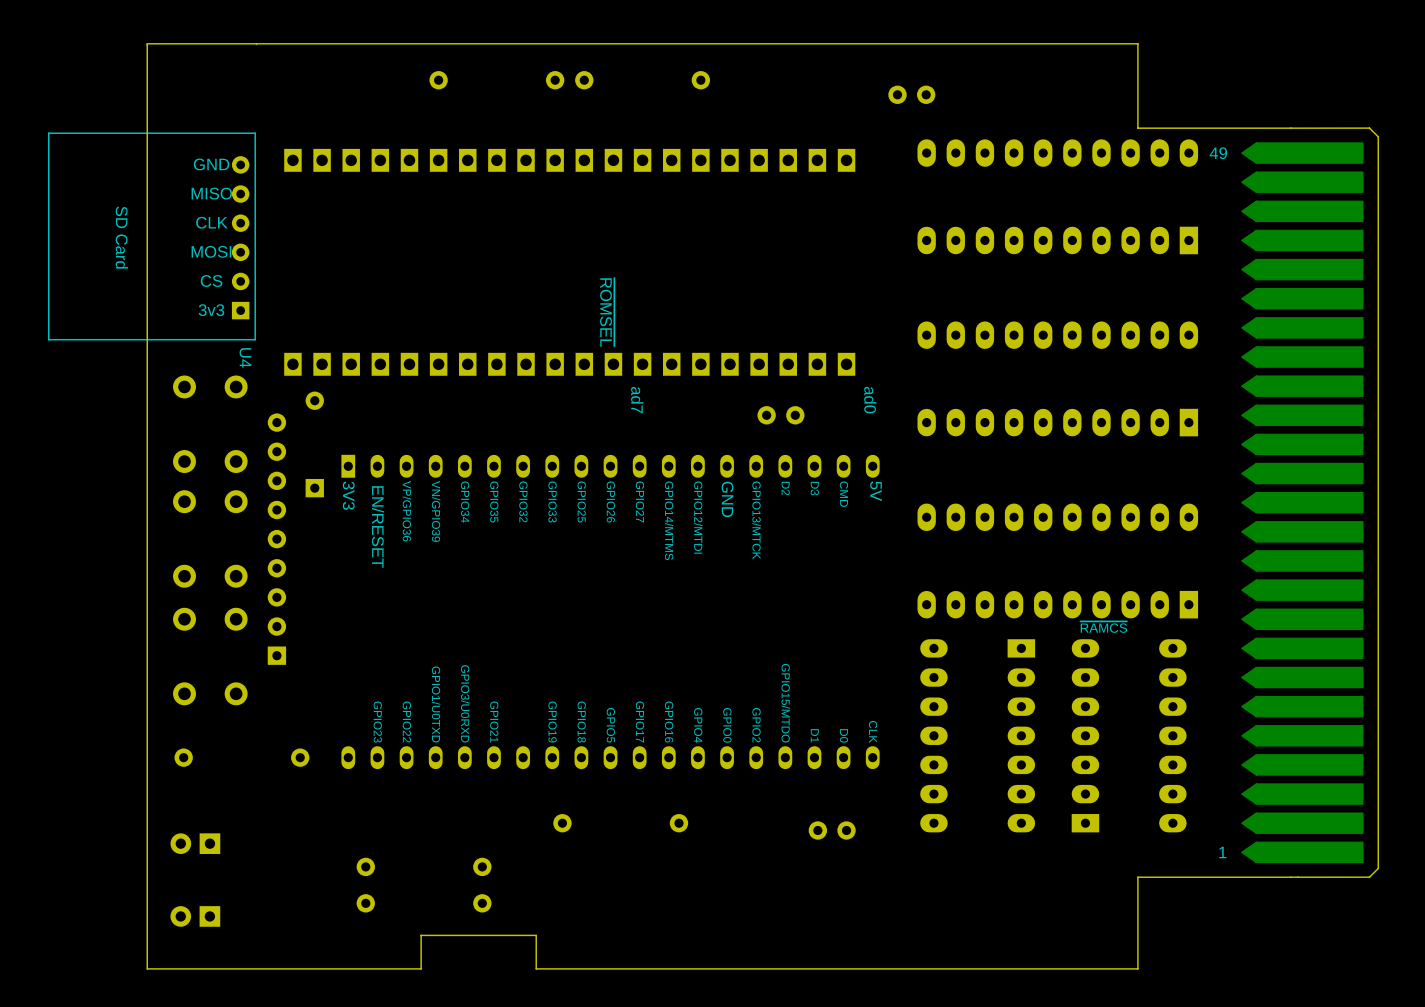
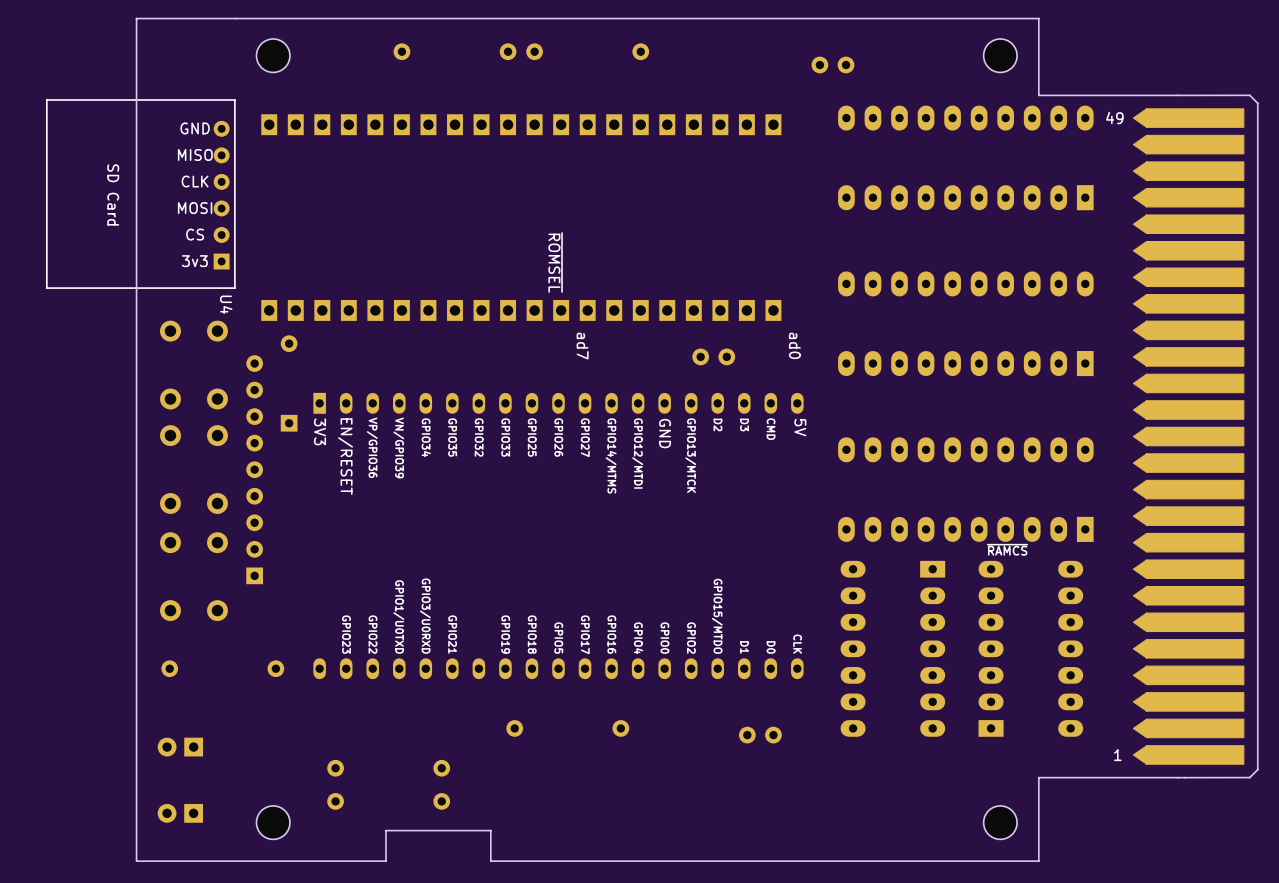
part: none -> (273, 55)
part: none -> (1000, 55)
part: none -> (273, 822)
part: none -> (1000, 822)

